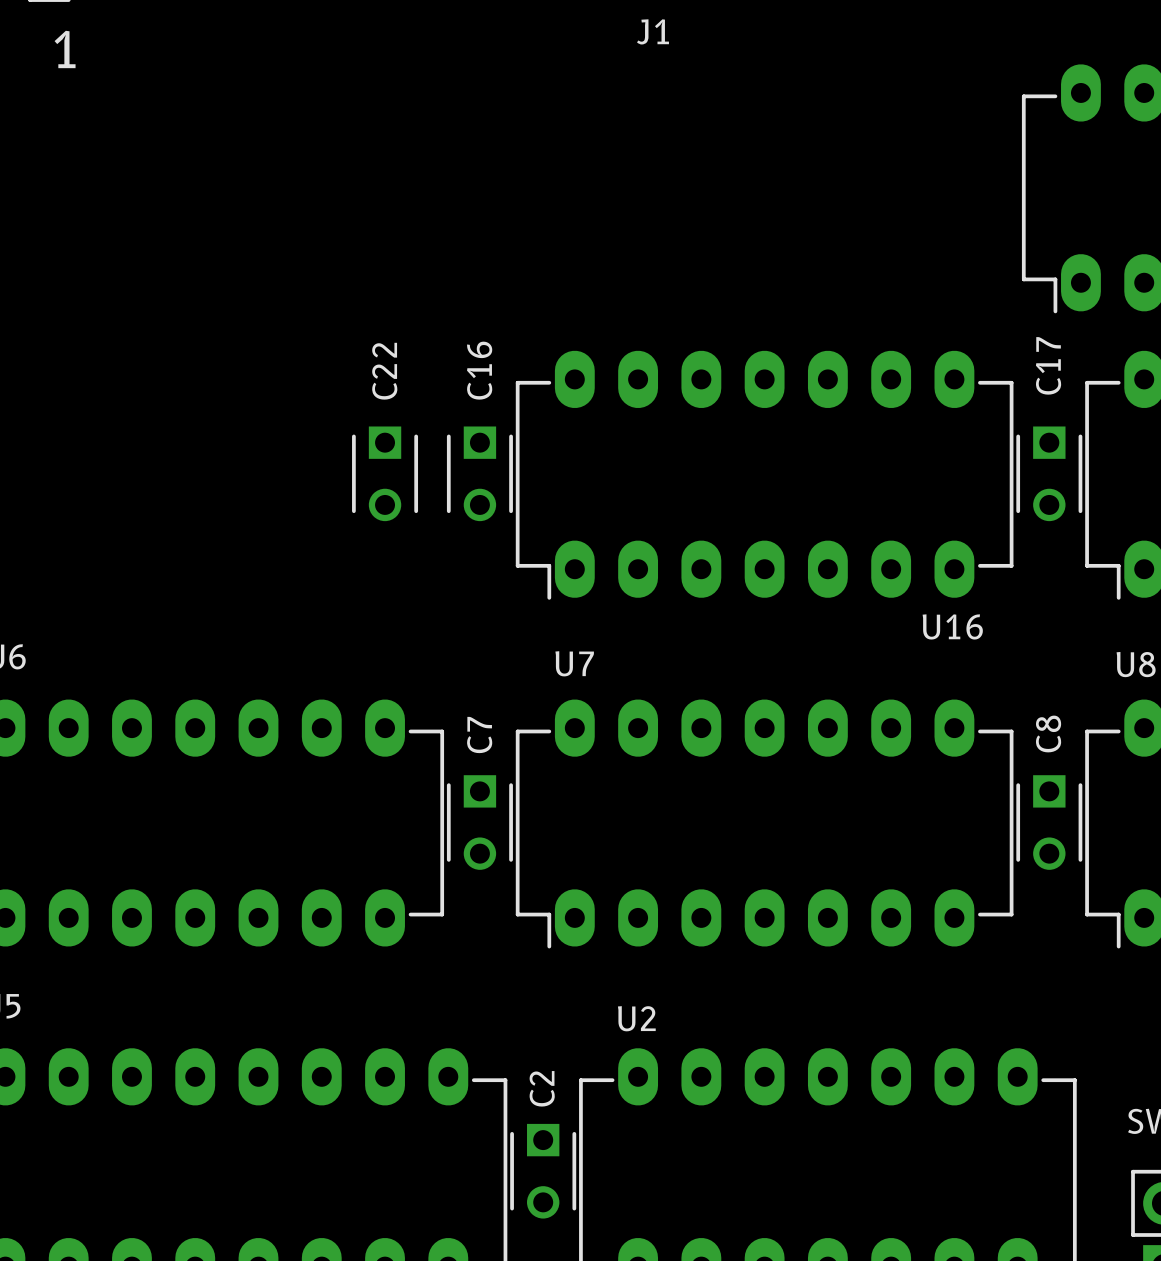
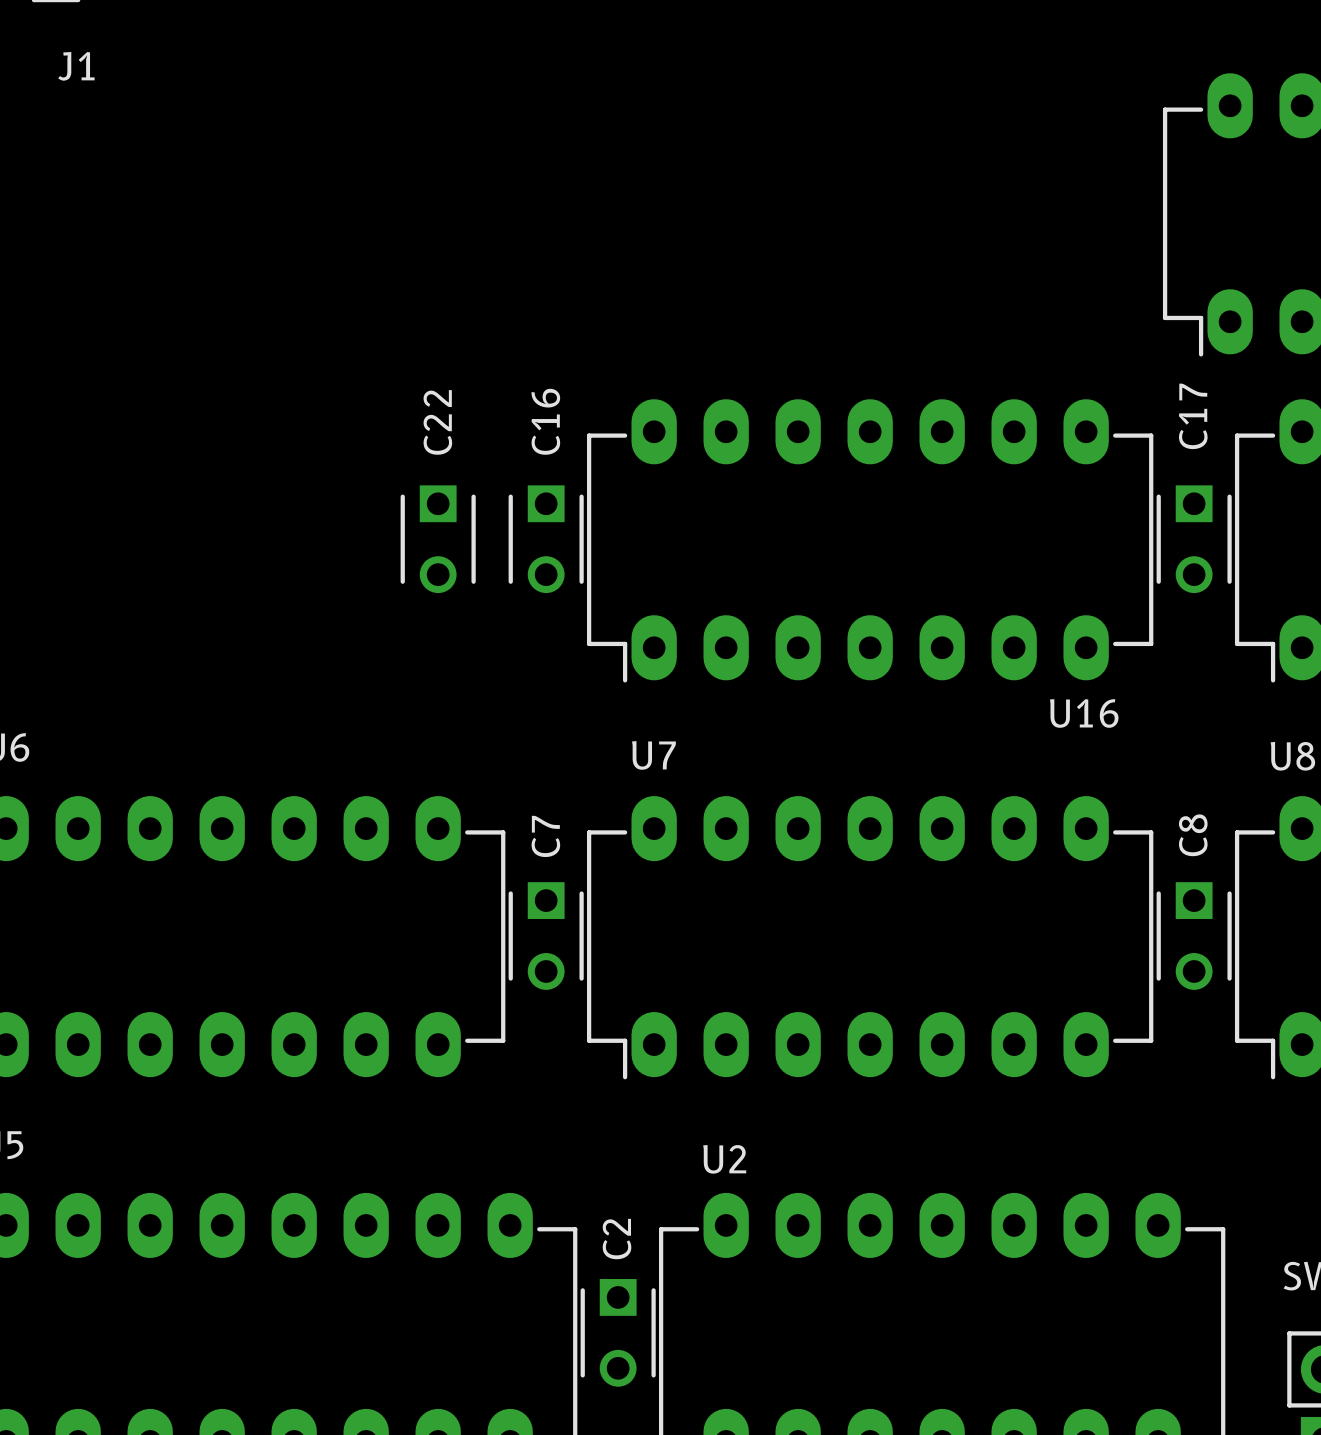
J1 name position: J1 (652, 31) -> J1 (76, 66)
text: 1 (65, 49) -> none

